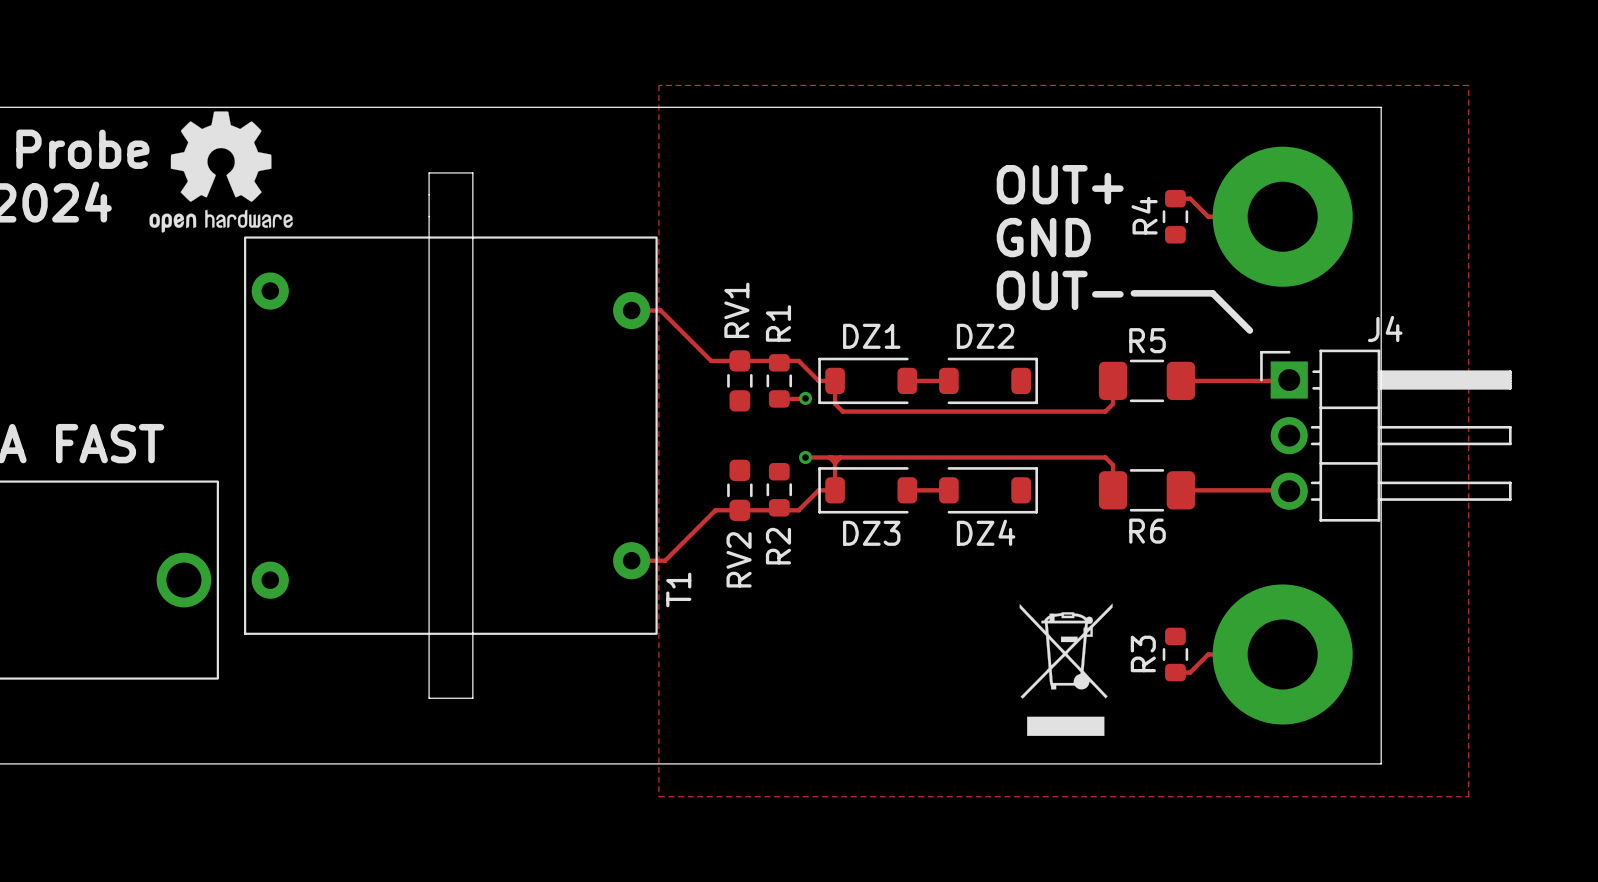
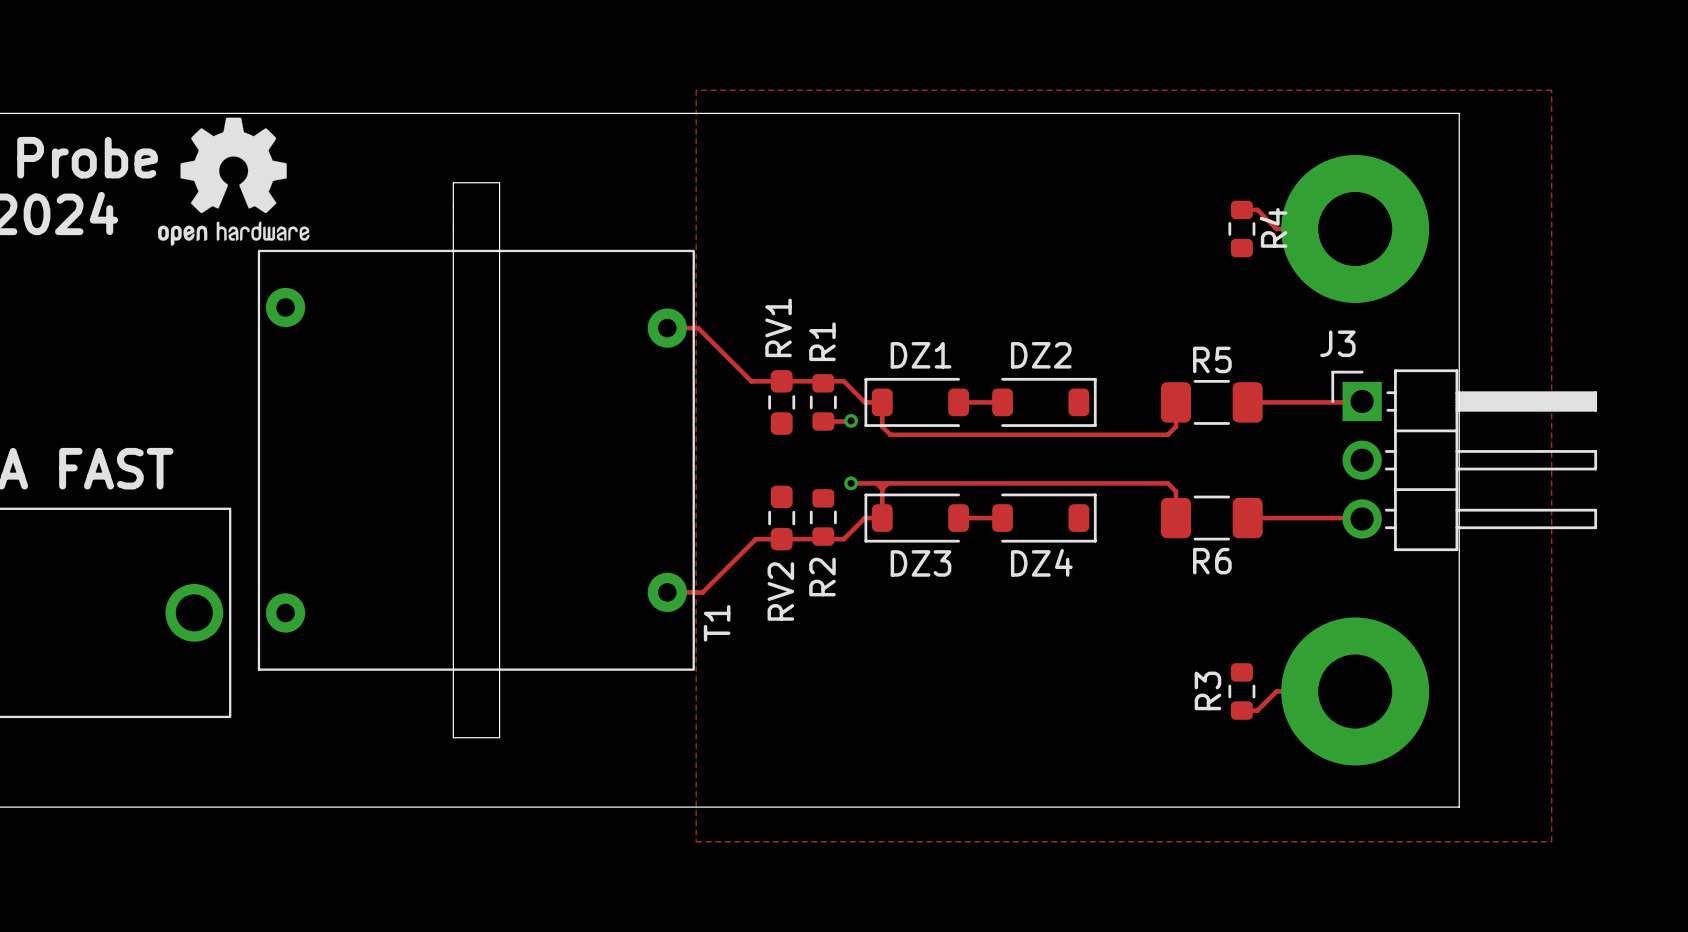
text: OUT+ (1060, 184) -> none
R4 name position: R4 (1144, 215) -> R4 (1273, 227)
text: GND (1043, 237) -> none
text: OUT- (1060, 290) -> none
line: (1133, 293) (1212, 293) (1249, 330) -> none
J4 name: J4 (1385, 328) -> J3 (1337, 343)
drawing: [1019, 603, 1113, 736] -> none

